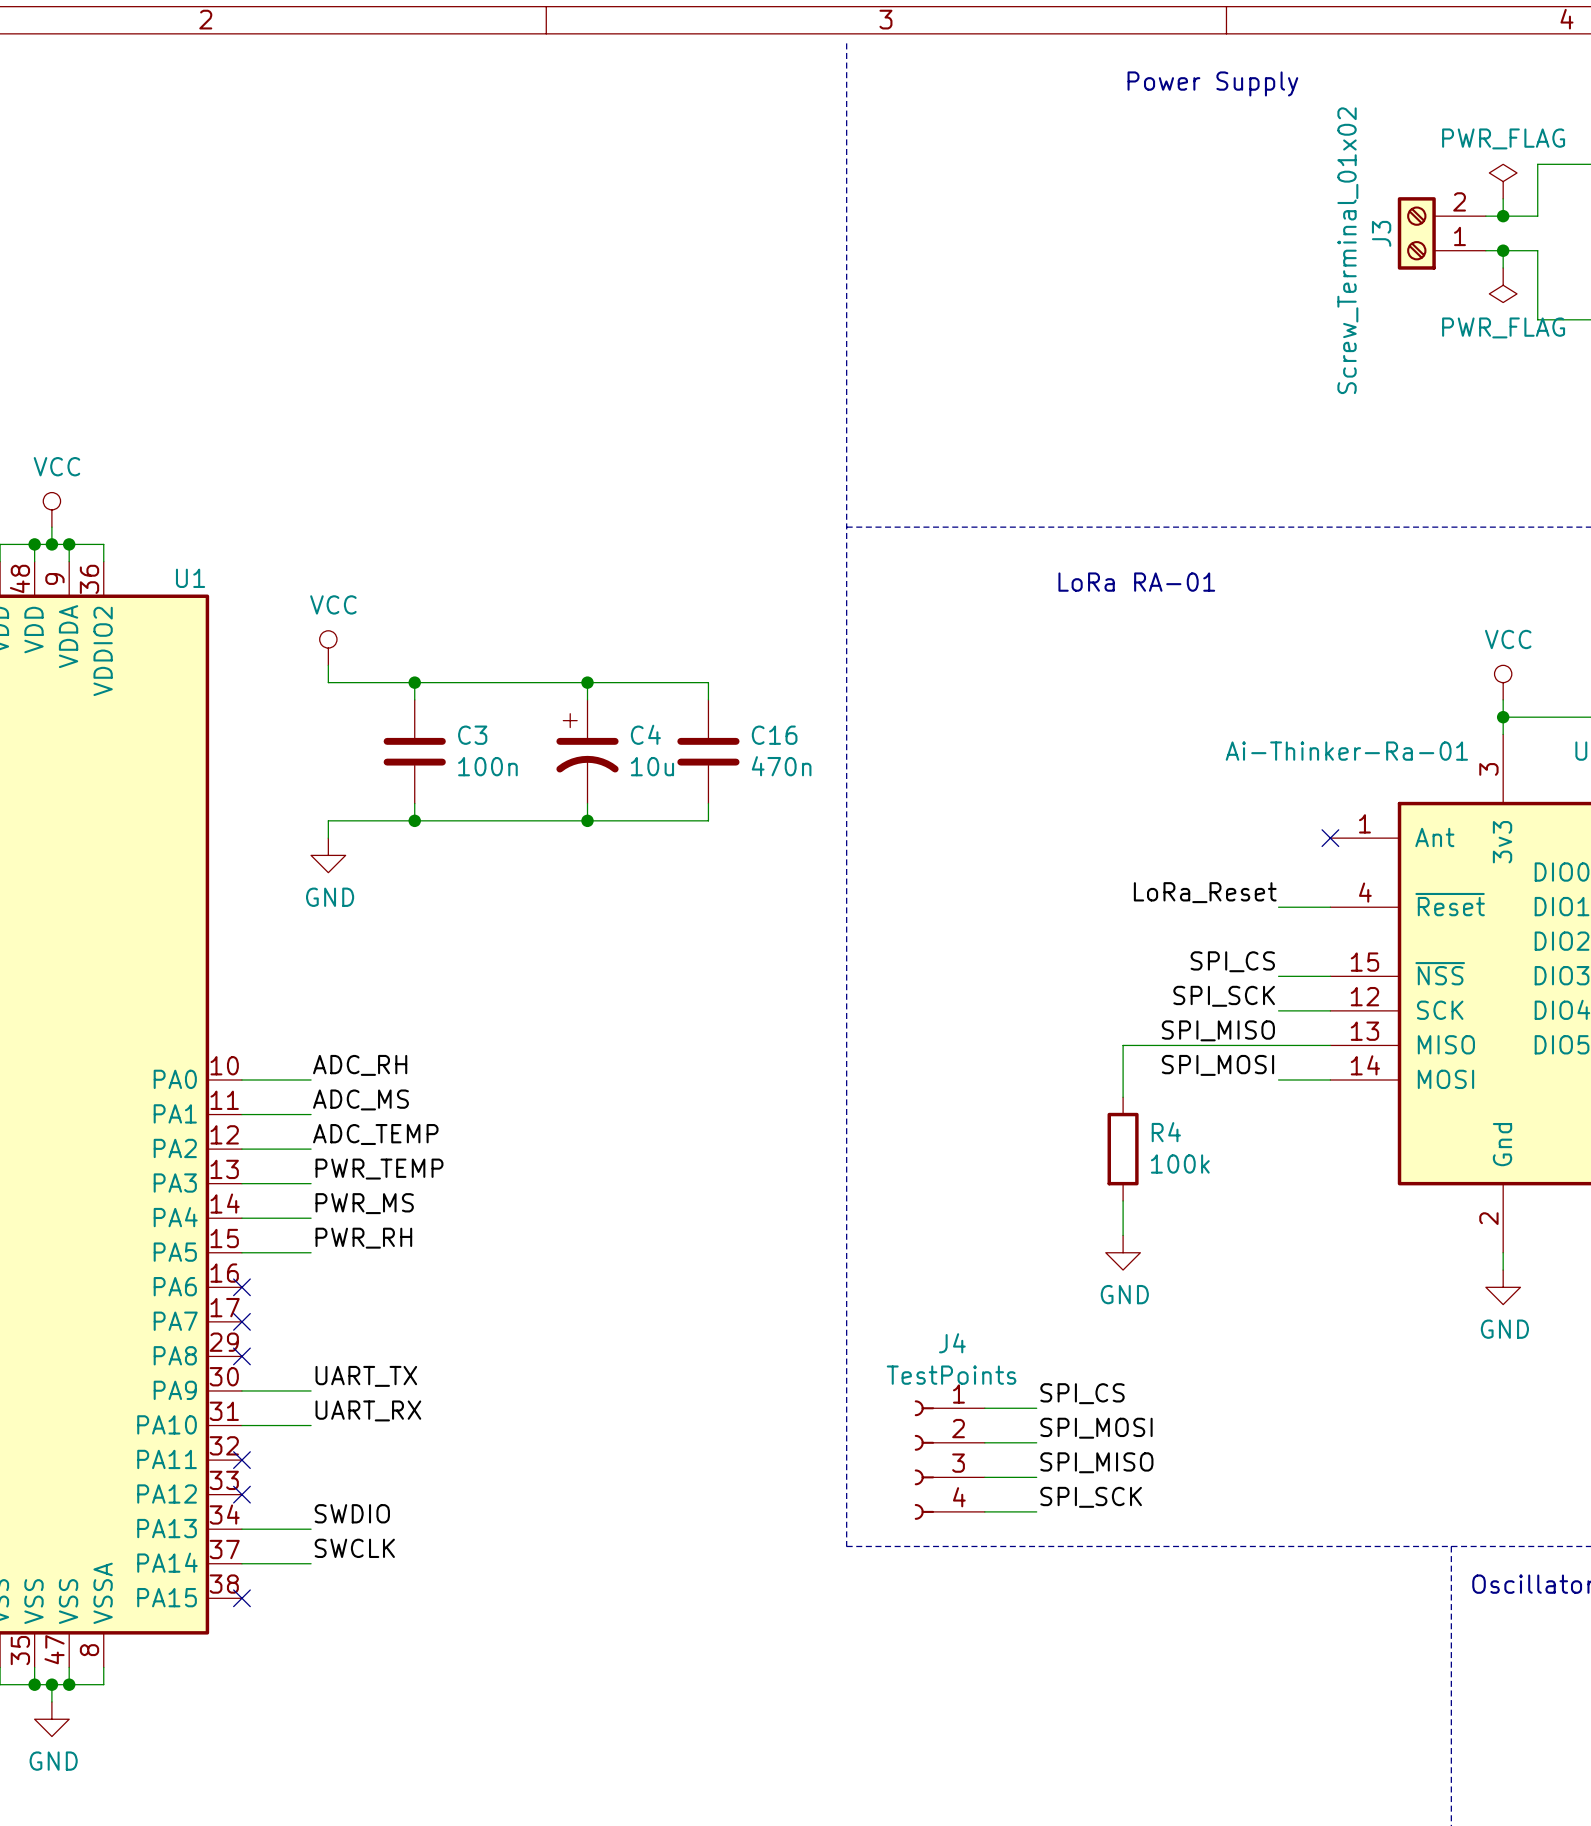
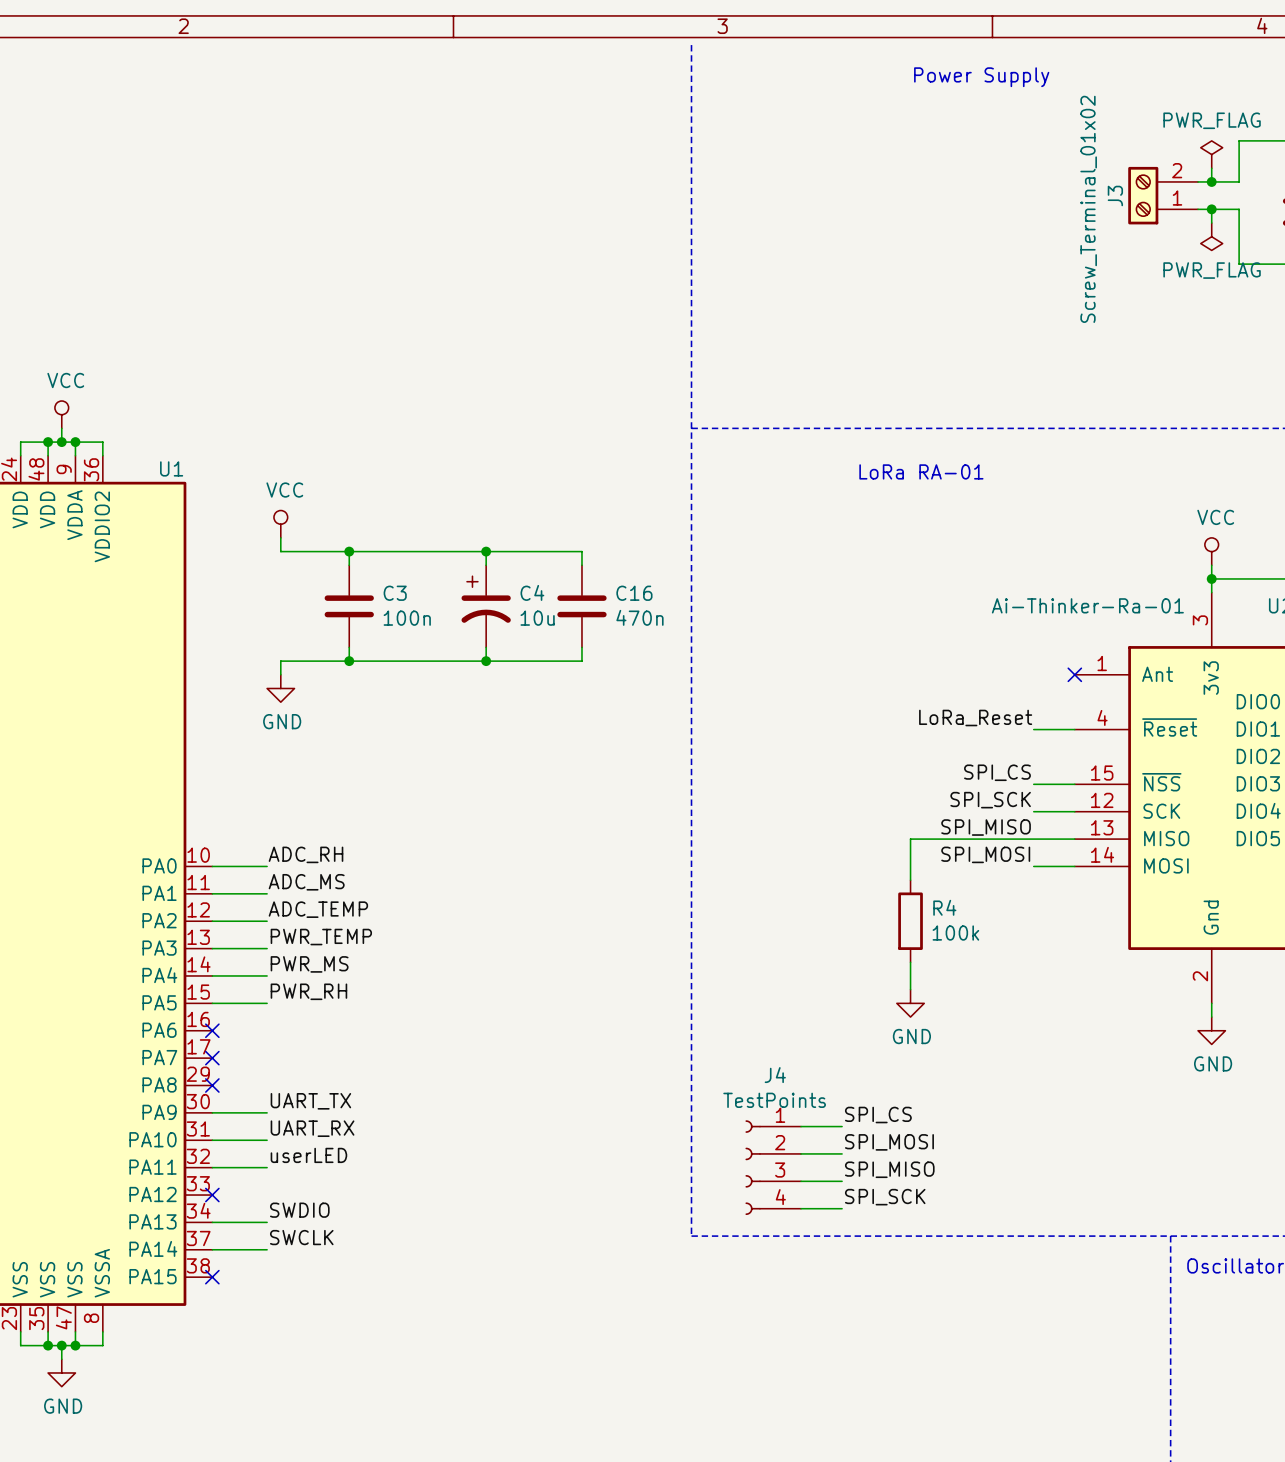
label: none -> userLED (308, 1155)
wire: none -> (212, 1167) (267, 1167)
no-connect mark: (241, 1460) -> none

